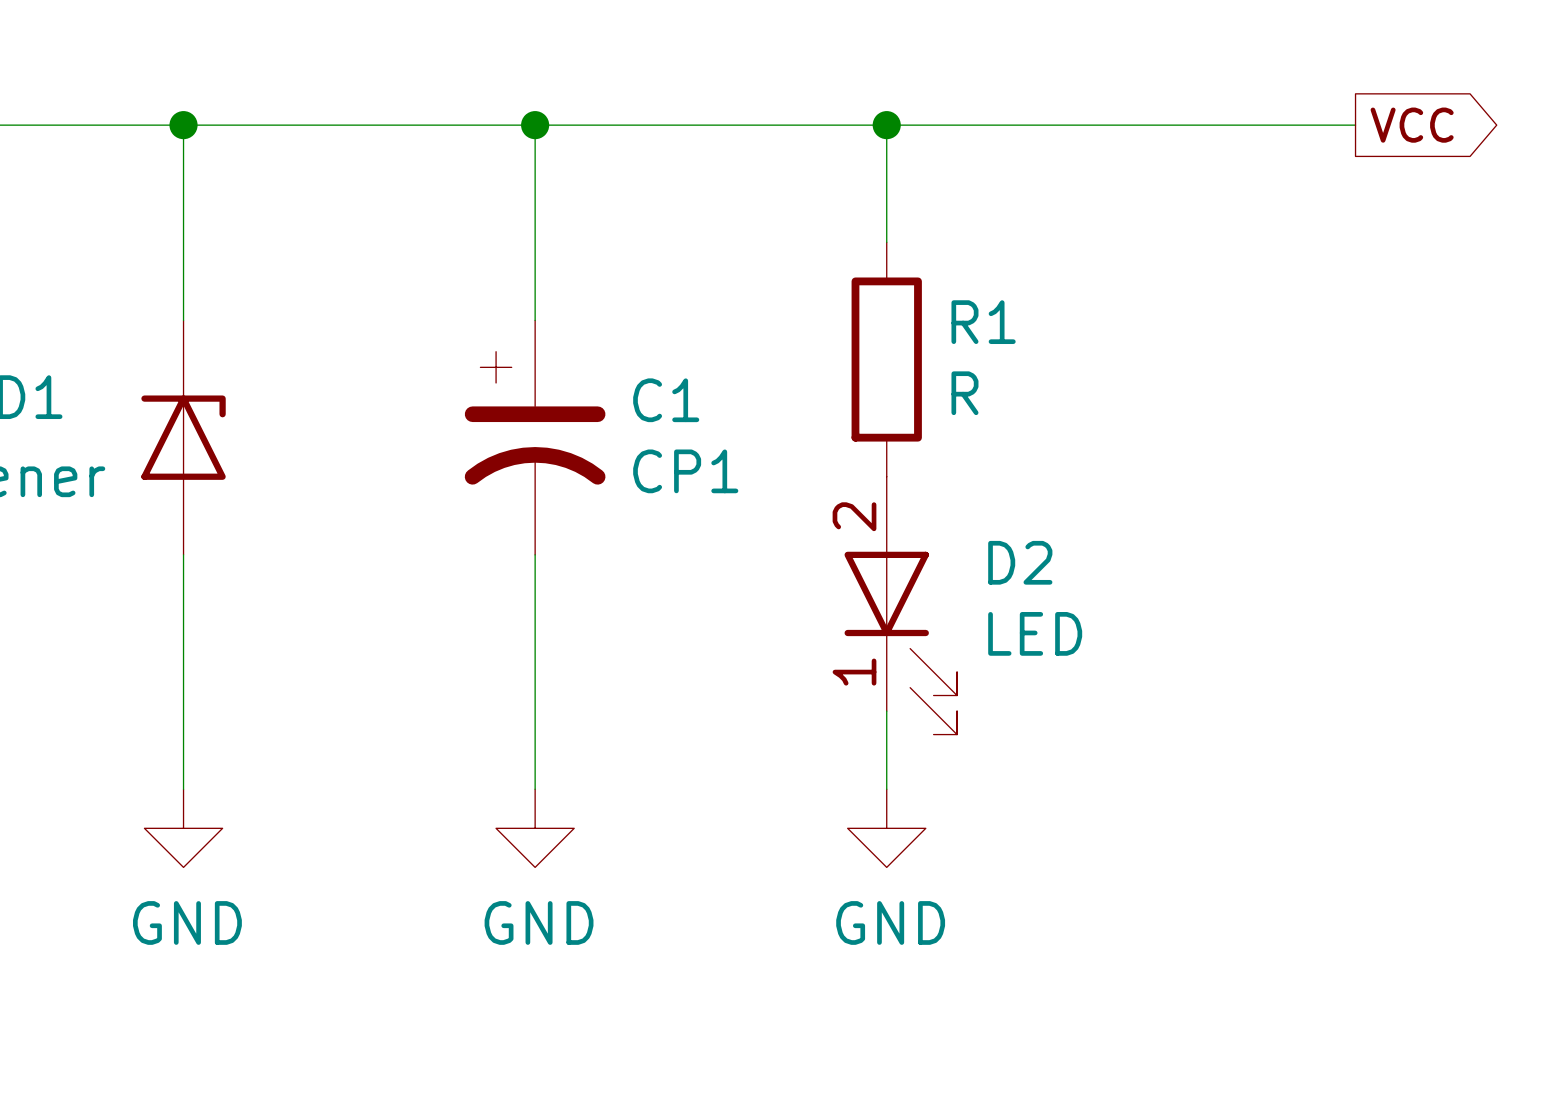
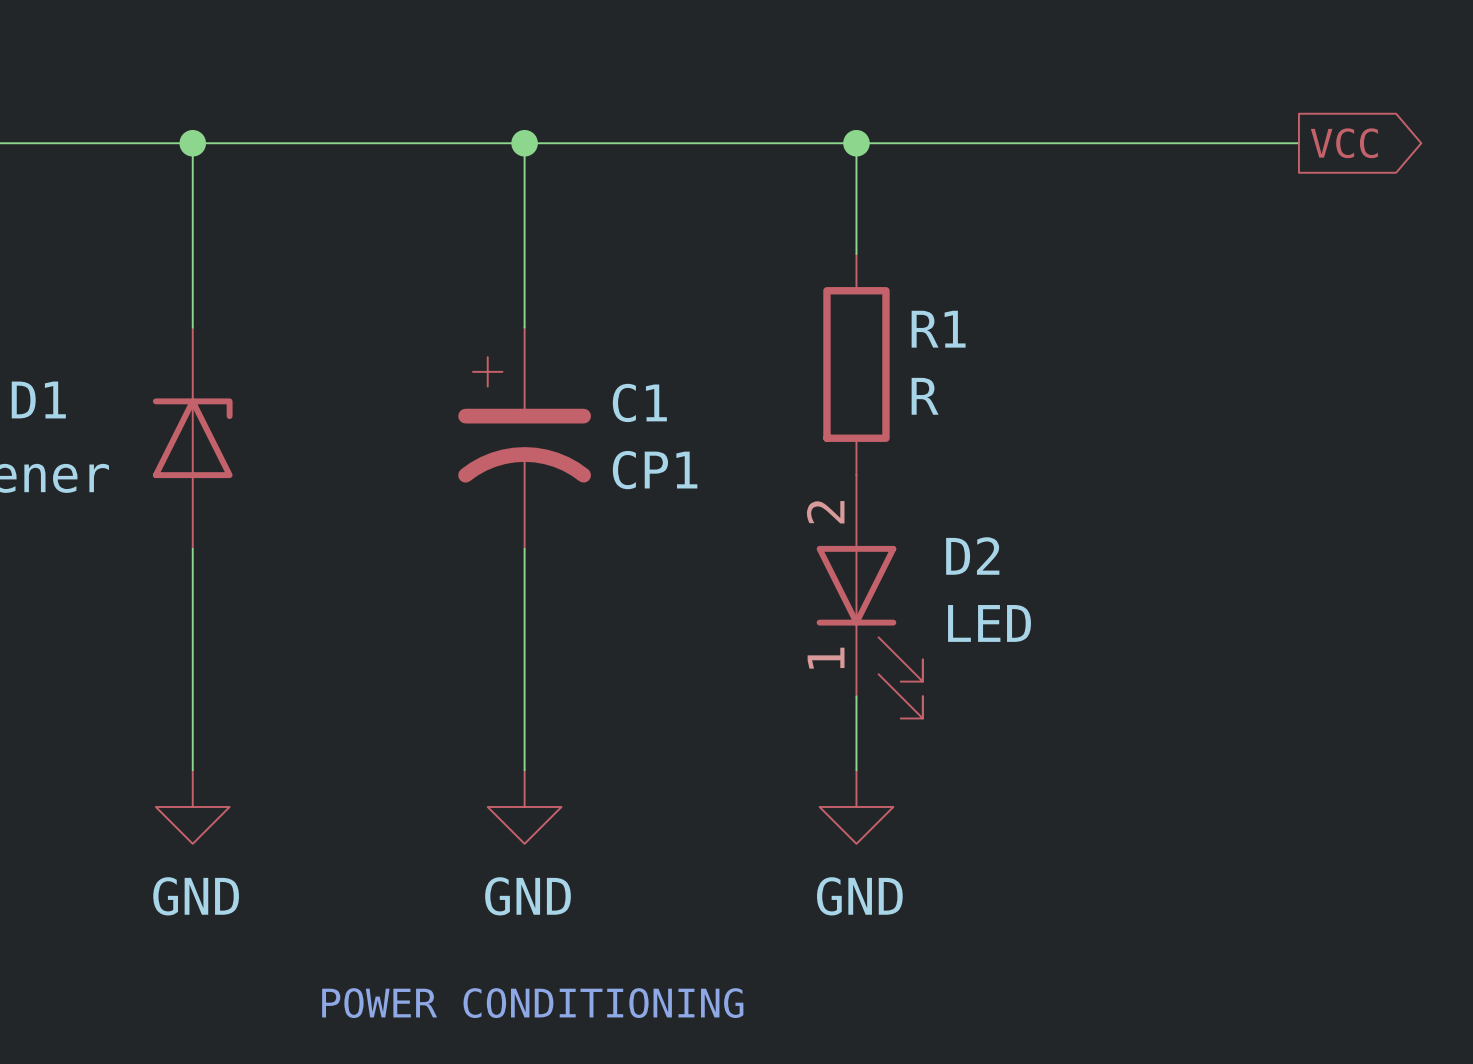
text: none -> POWER CONDITIONING (532, 1003)

